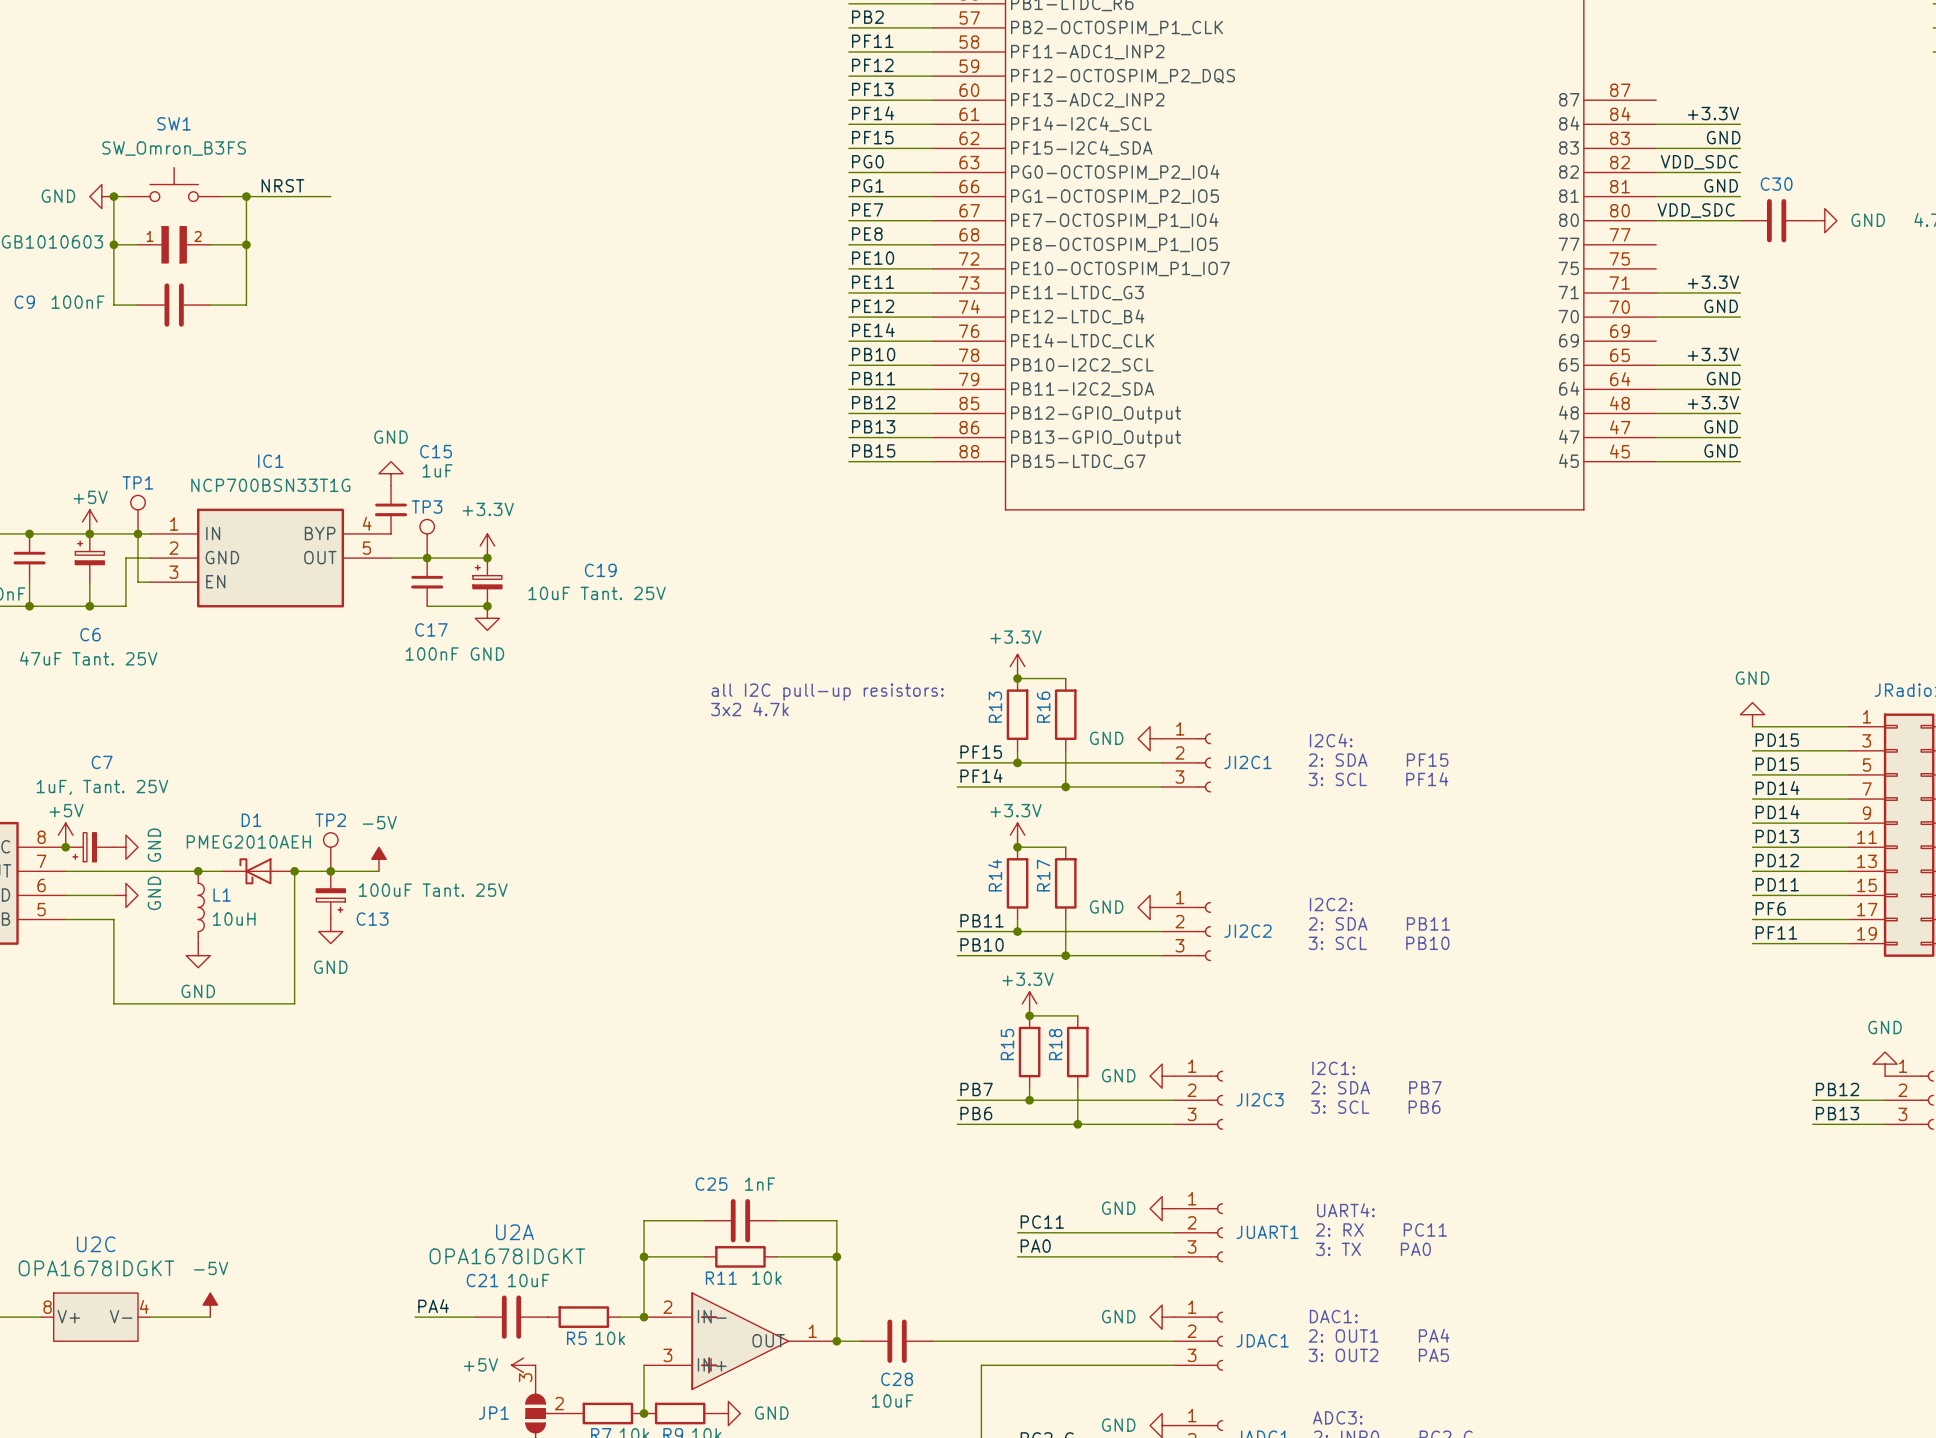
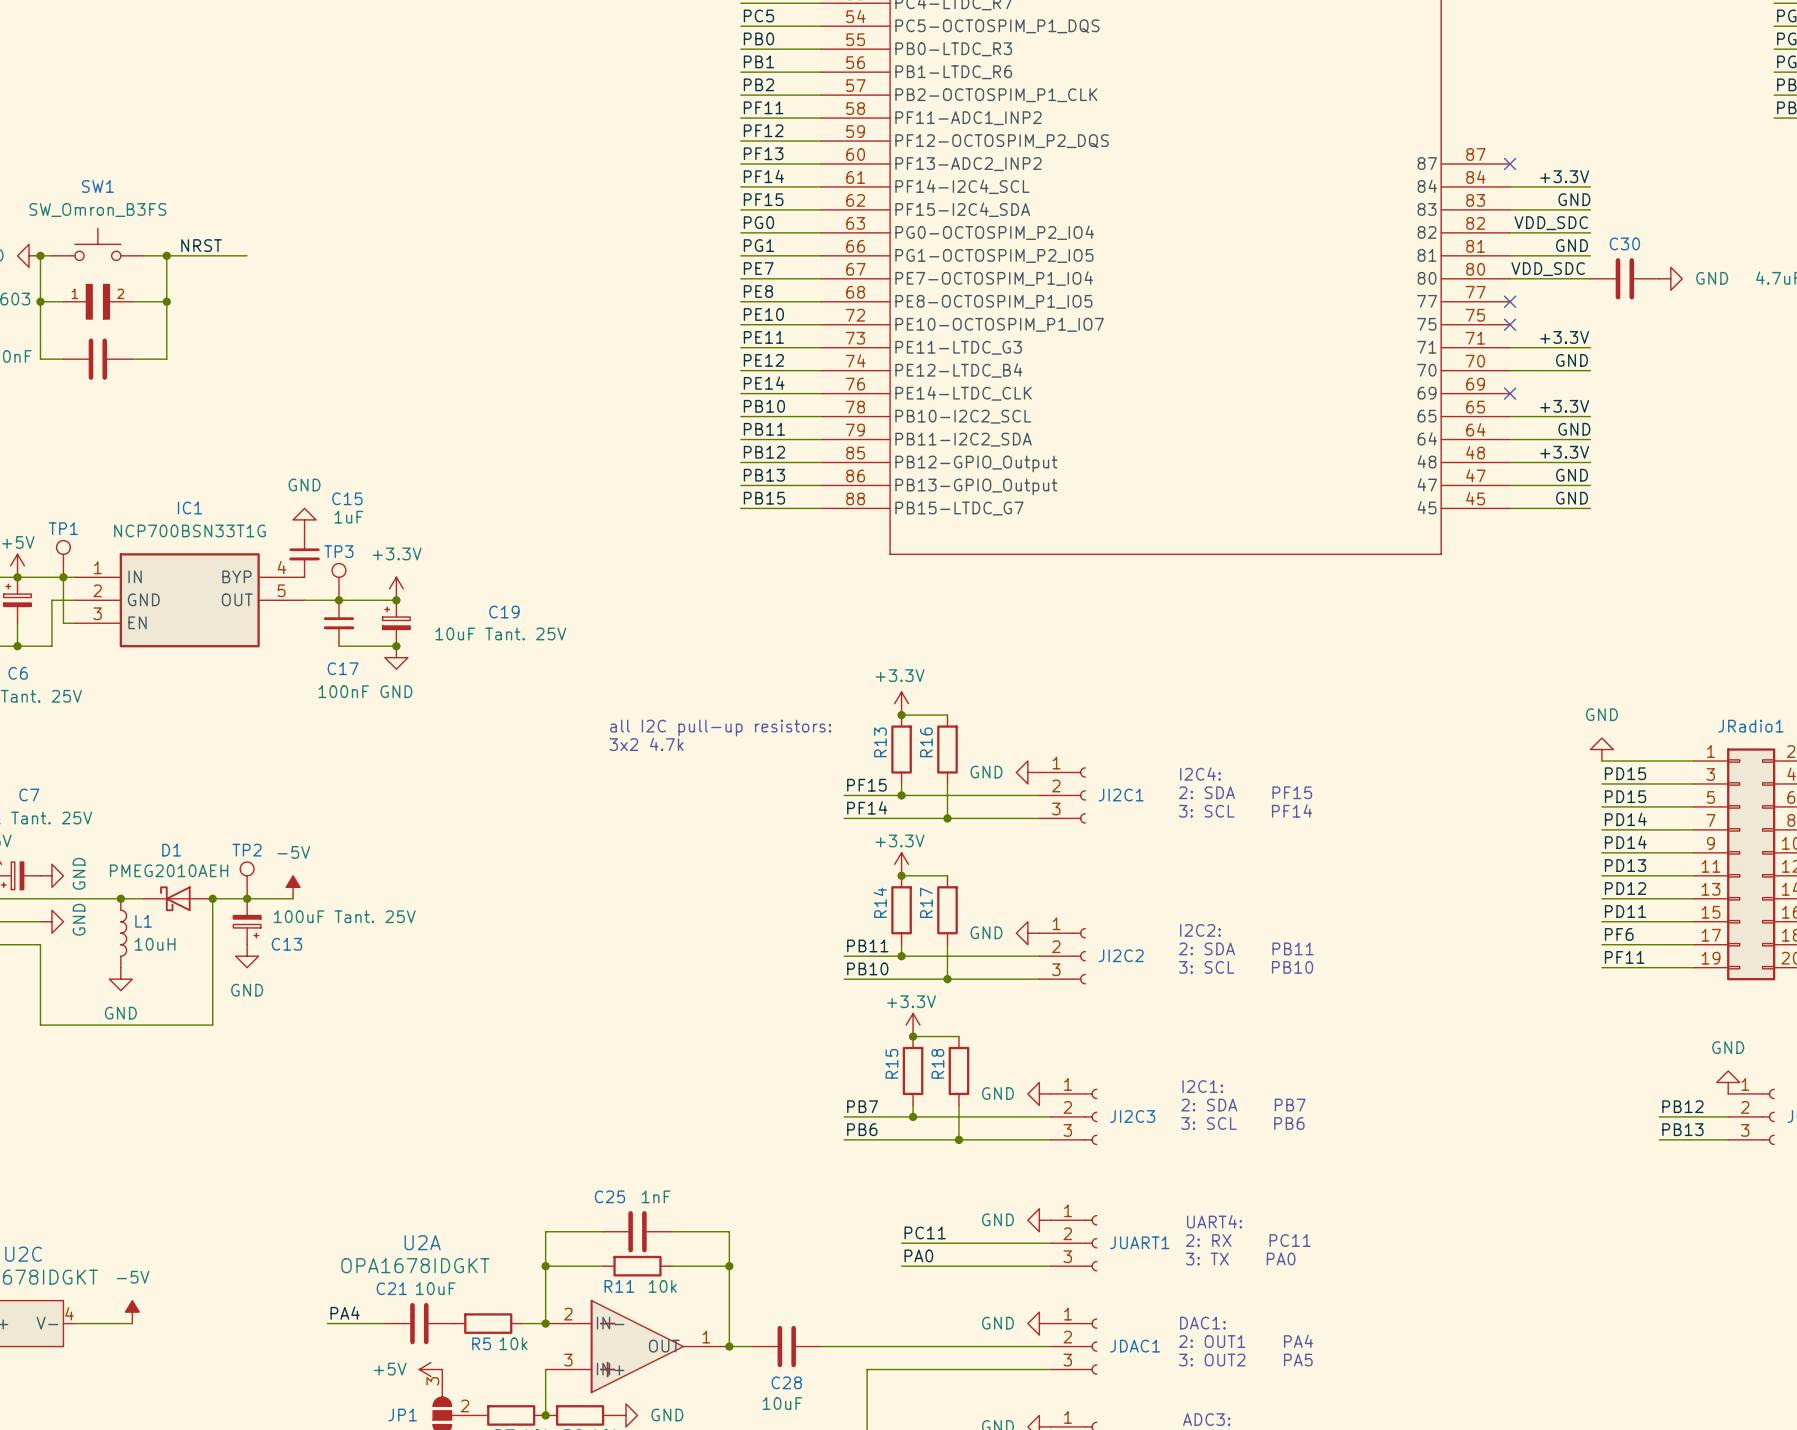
no-connect mark: none -> (1510, 163)
no-connect mark: none -> (1510, 301)
no-connect mark: none -> (1510, 324)
no-connect mark: none -> (1510, 393)

